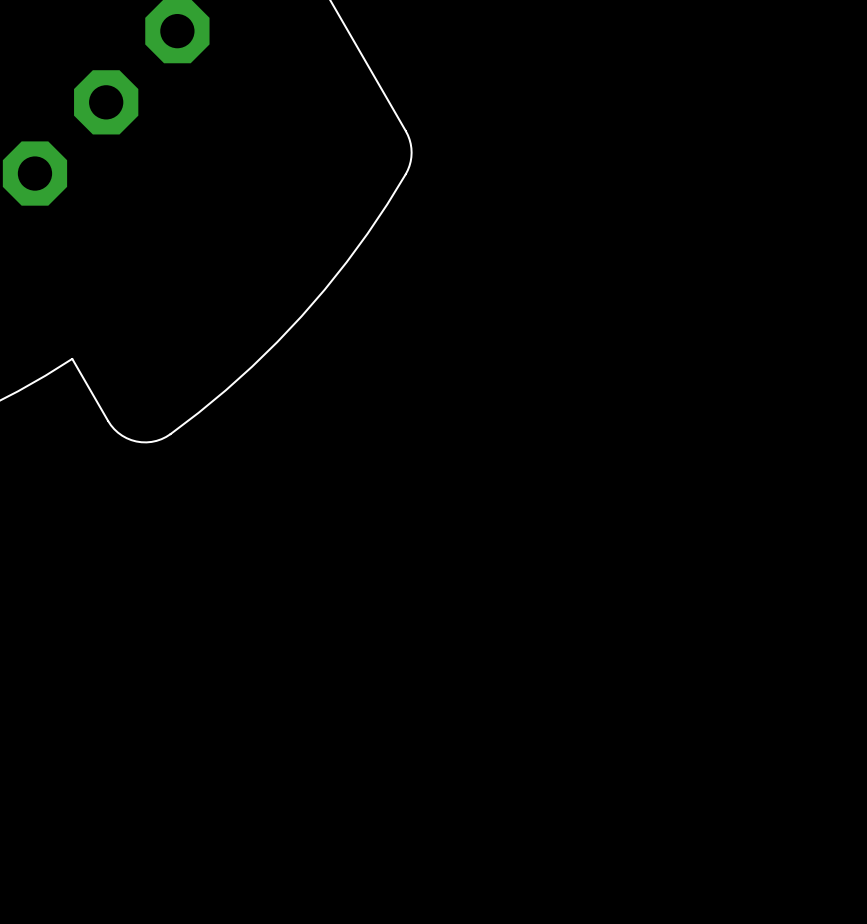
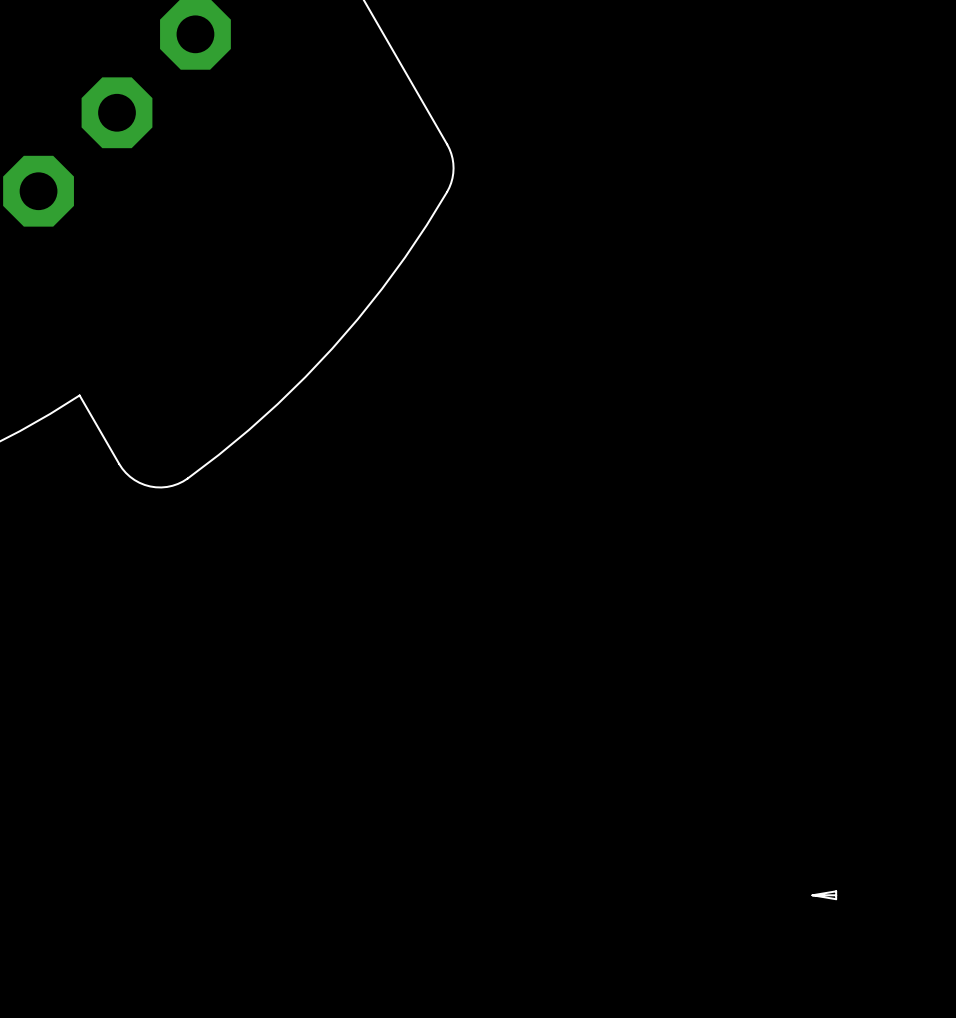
board edge: none -> (812, 895) (836, 891) (836, 899) (812, 895)
board edge: none -> (836, 895) (812, 895)

